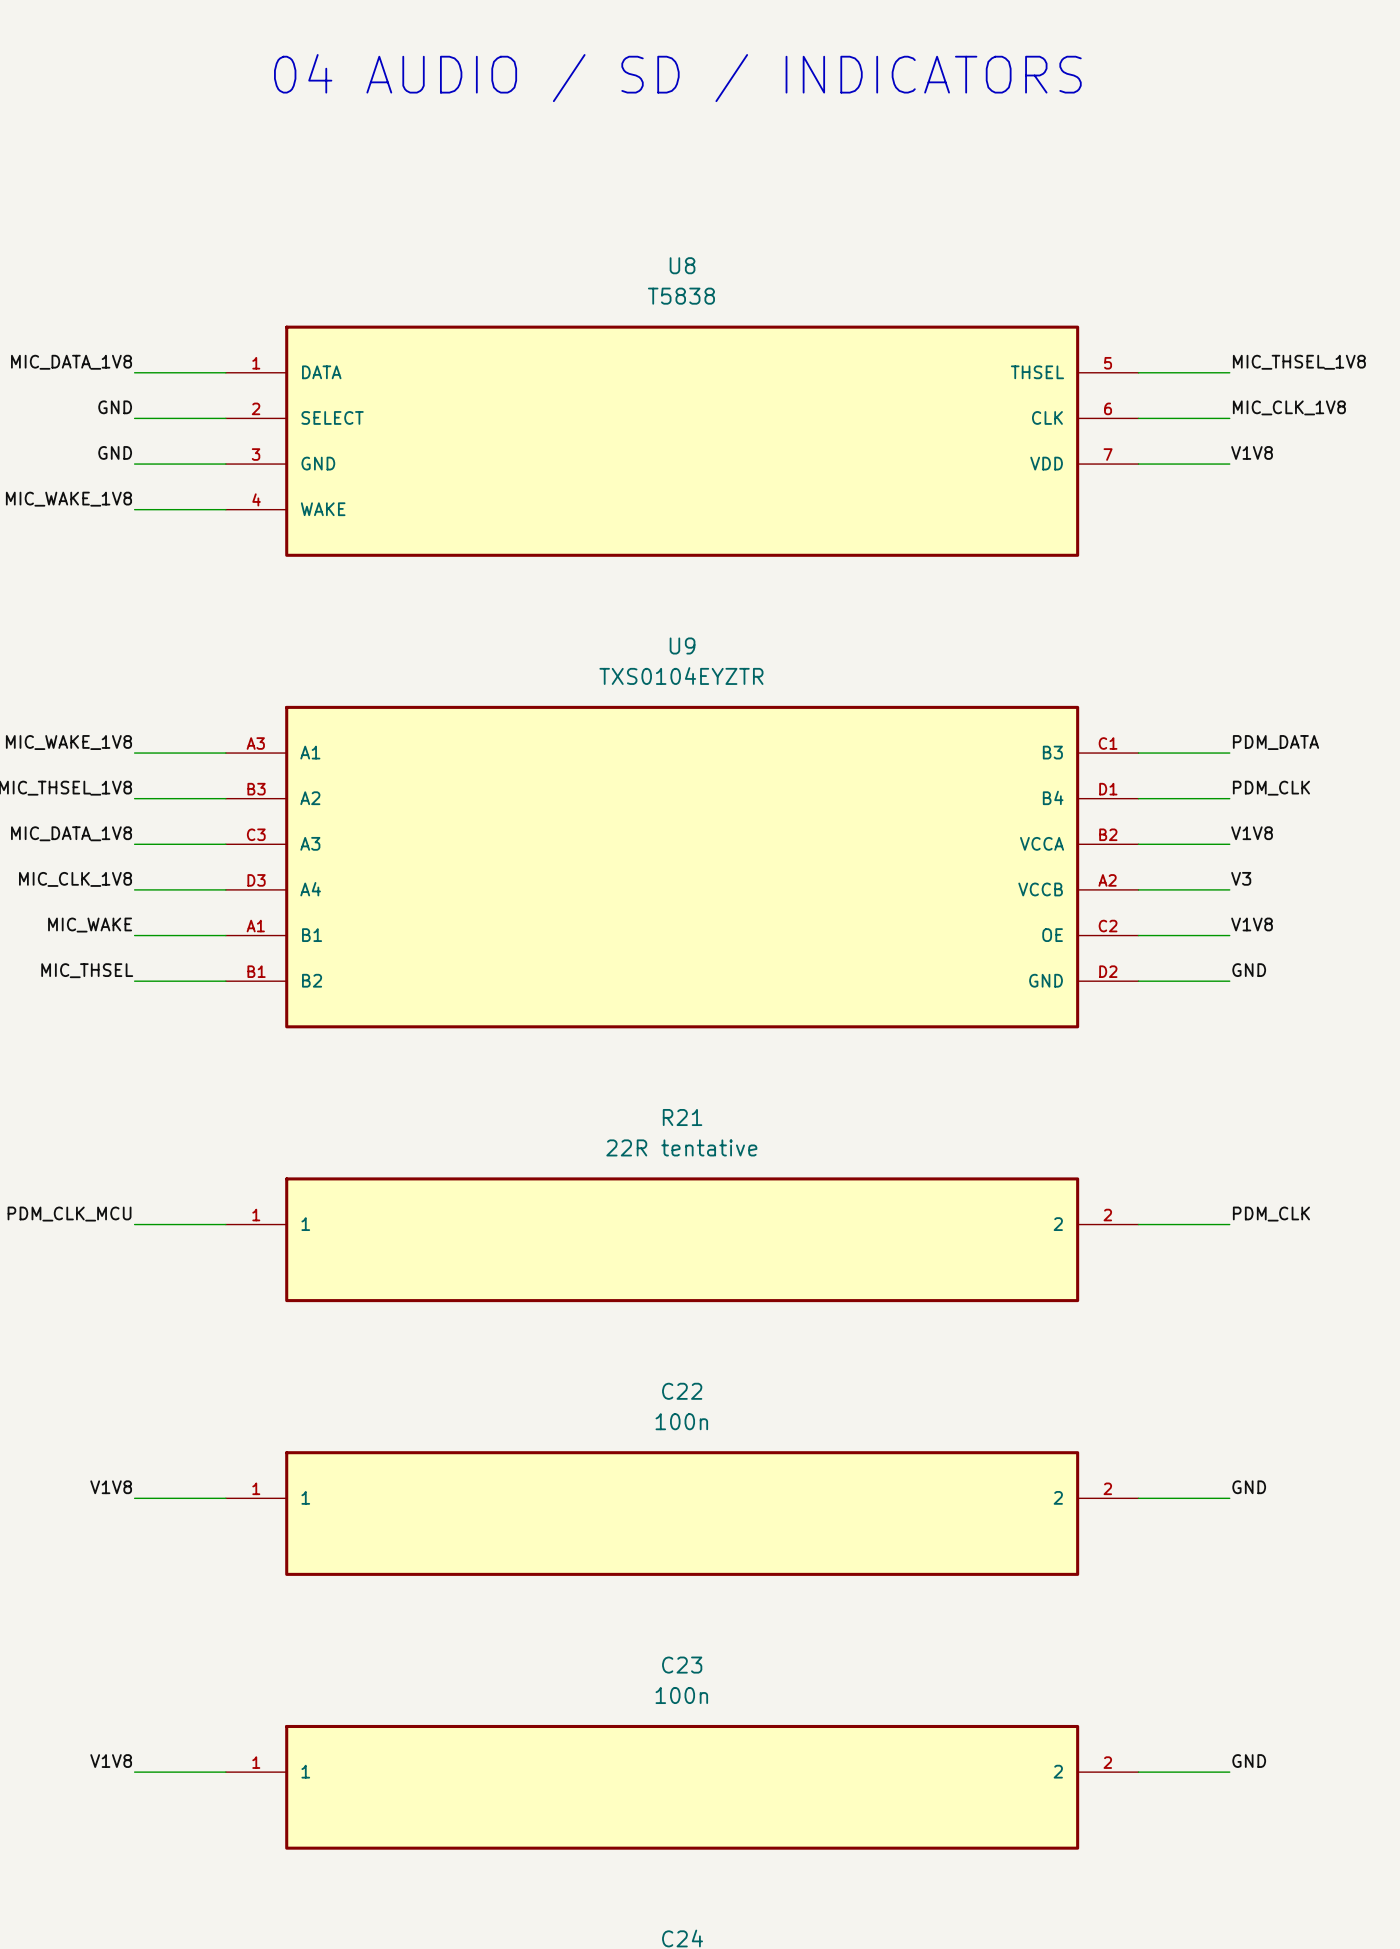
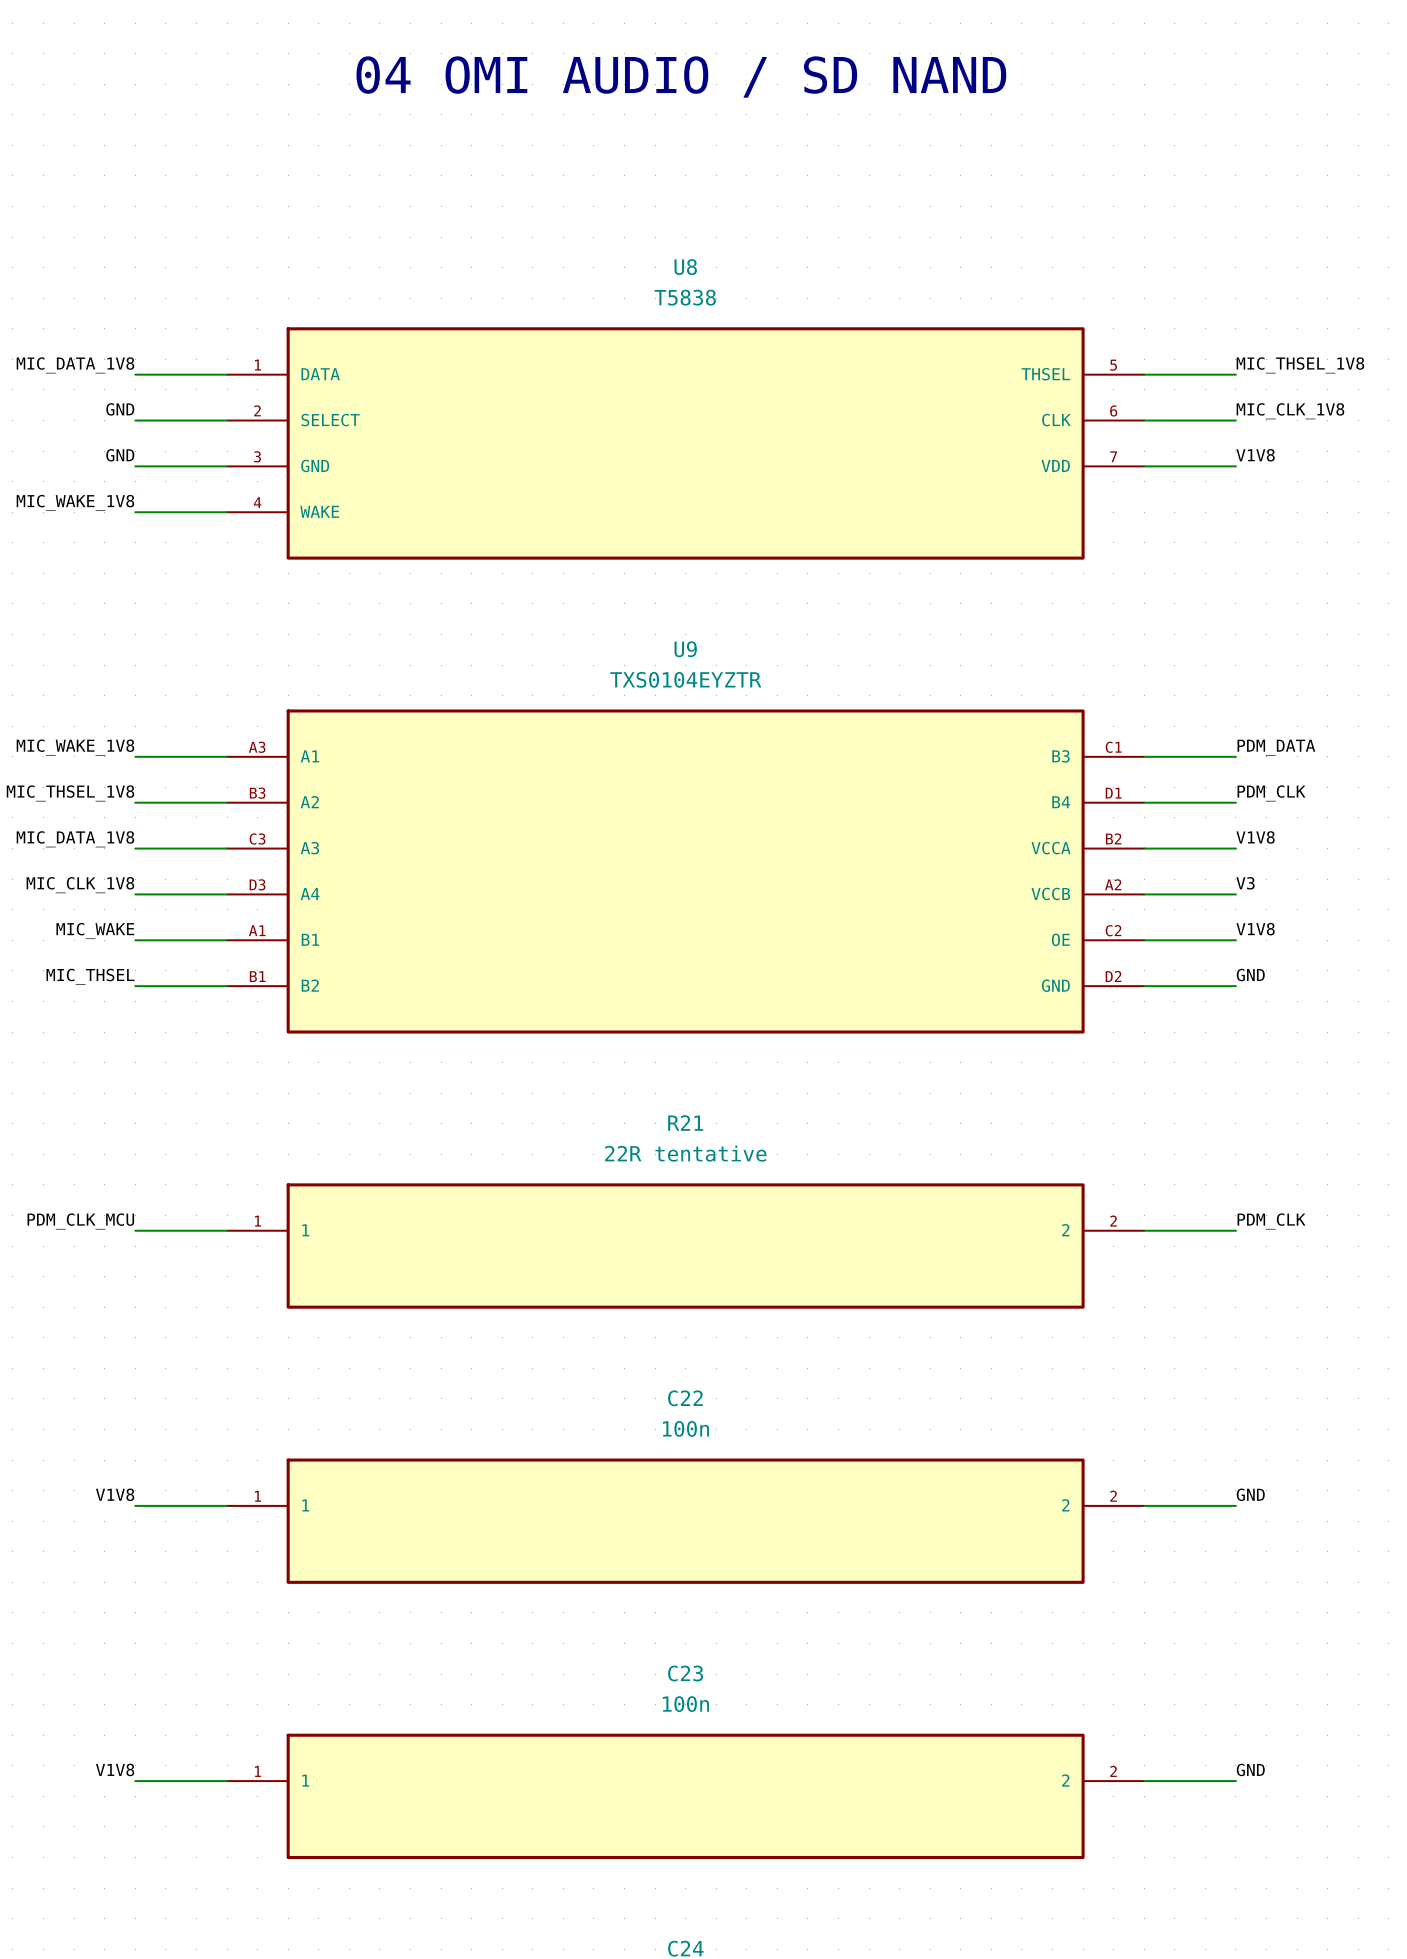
text: 04 AUDIO / SD / INDICATORS (677, 78) -> 04 OMI AUDIO / SD NAND (681, 77)

